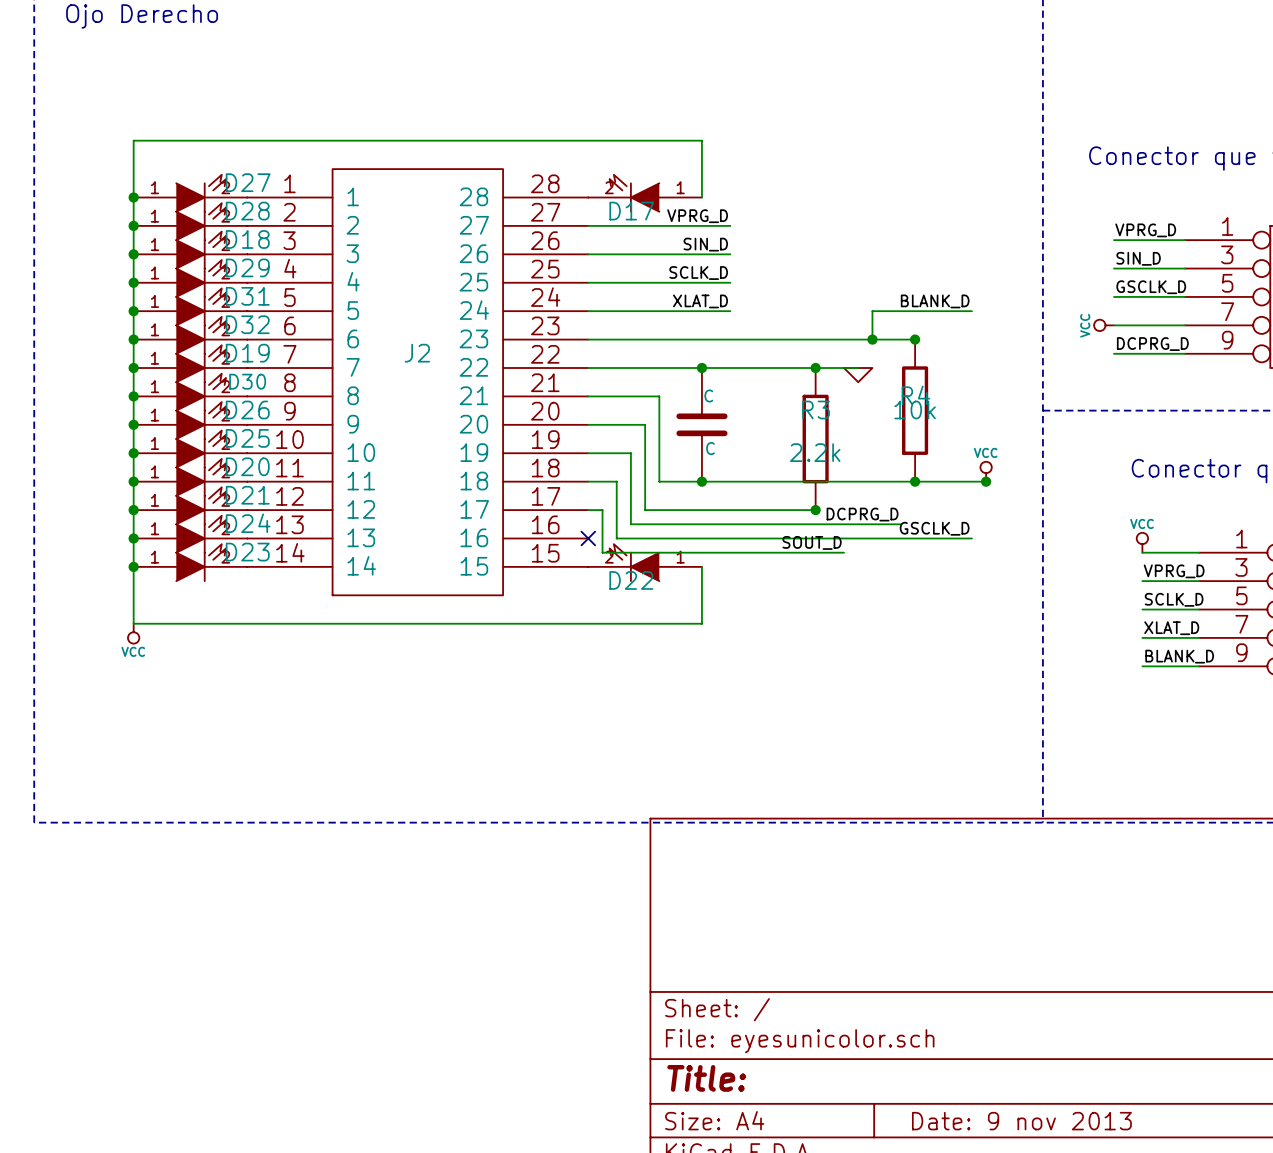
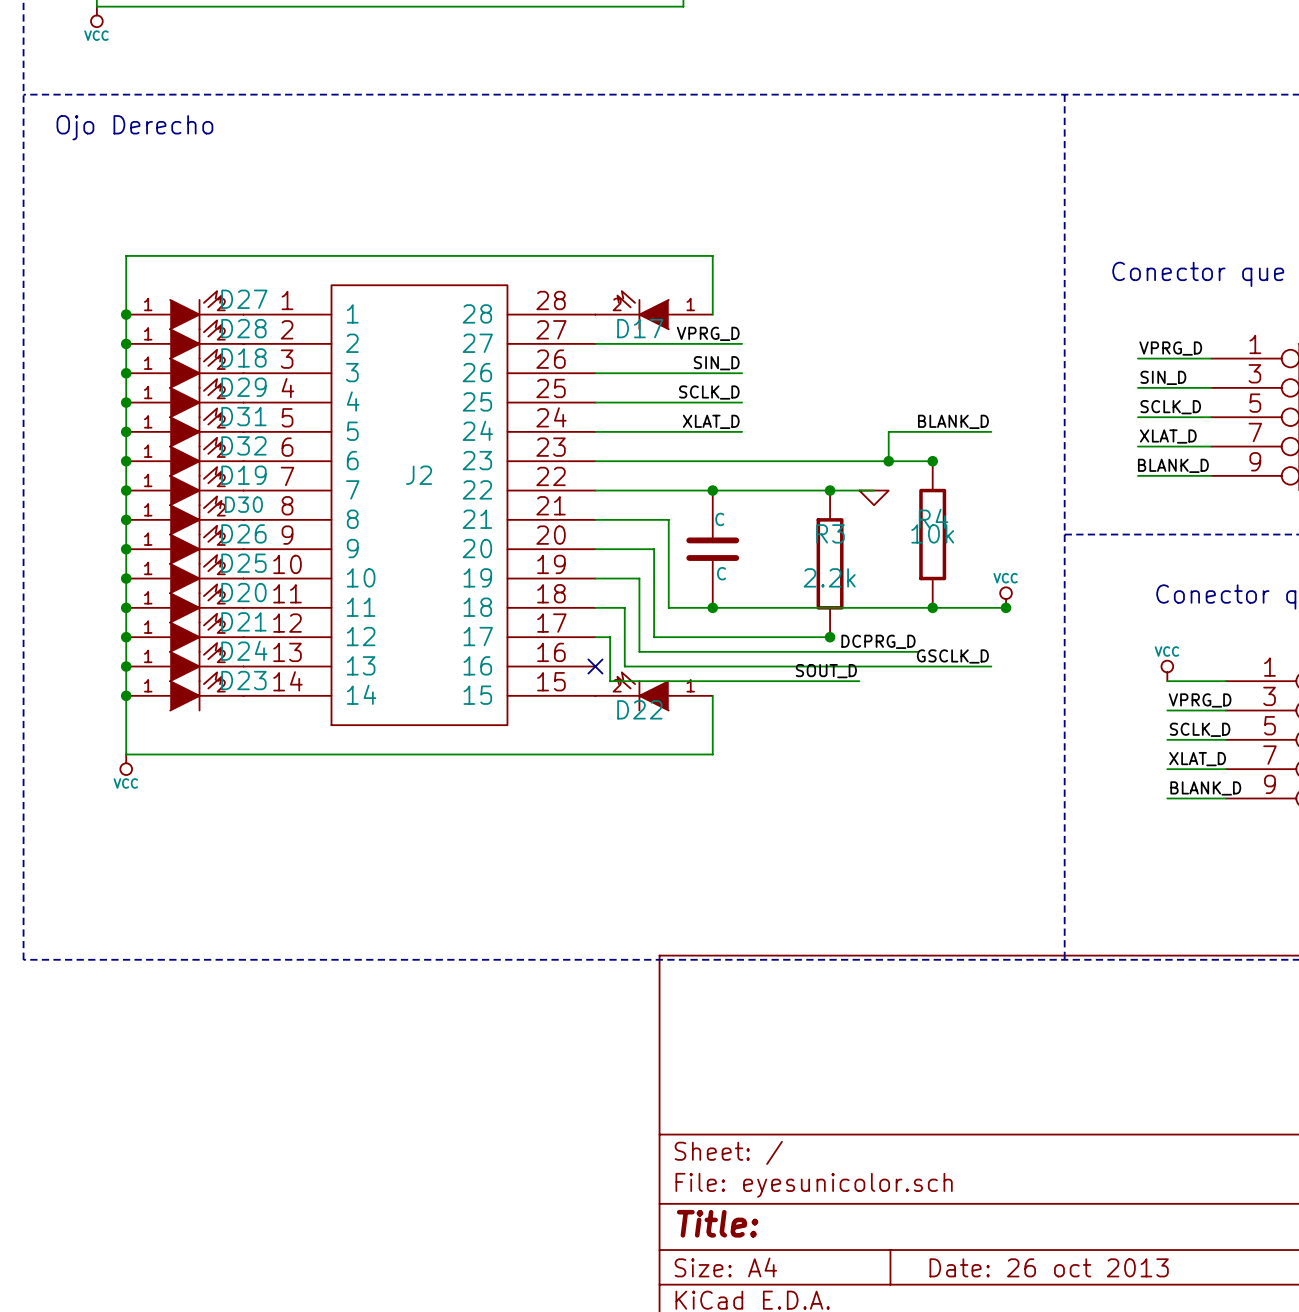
label: GSCLK_D (1151, 287) -> SCLK_D (1170, 407)
label: none -> XLAT_D (1168, 436)
power symbol: (1104, 325) -> none
label: none -> BLANK_D (1173, 465)
label: DCPRG_D (1152, 344) -> none
title block: Date: 9 nov 2013 (1021, 1121) -> Date: 26 oct 2013 (1049, 1267)

